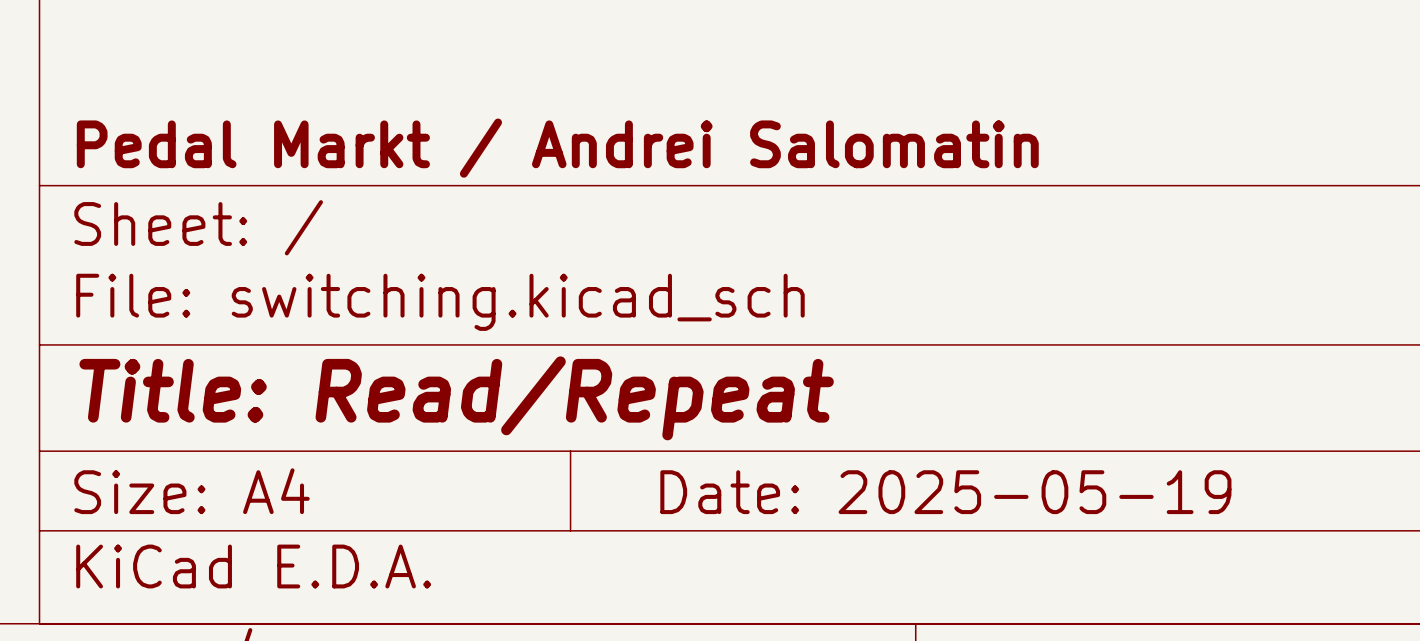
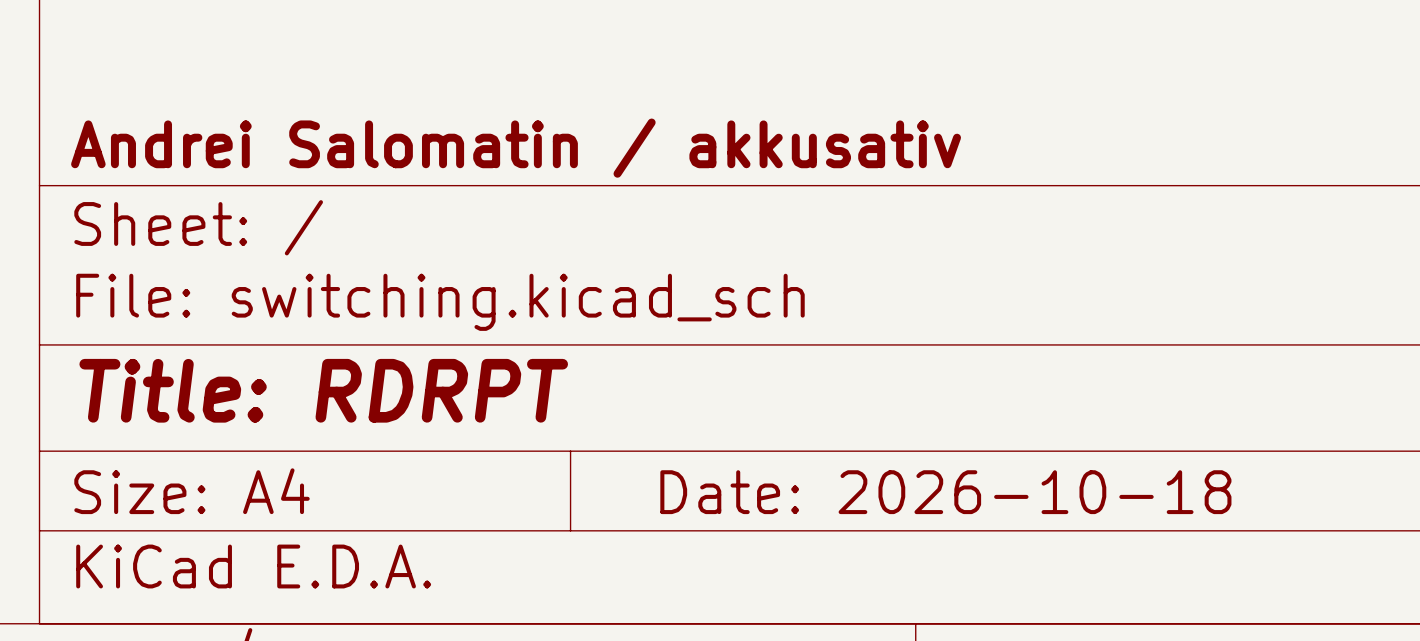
title block: Pedal Markt / Andrei Salomatin (557, 148) -> Andrei Salomatin / akkusativ (516, 148)
title block: Title: Read/Repeat (456, 398) -> Title: RDRPT (323, 390)
title block: Date: 2025-05-19 (945, 492) -> Date: 2026-10-18 (945, 492)

